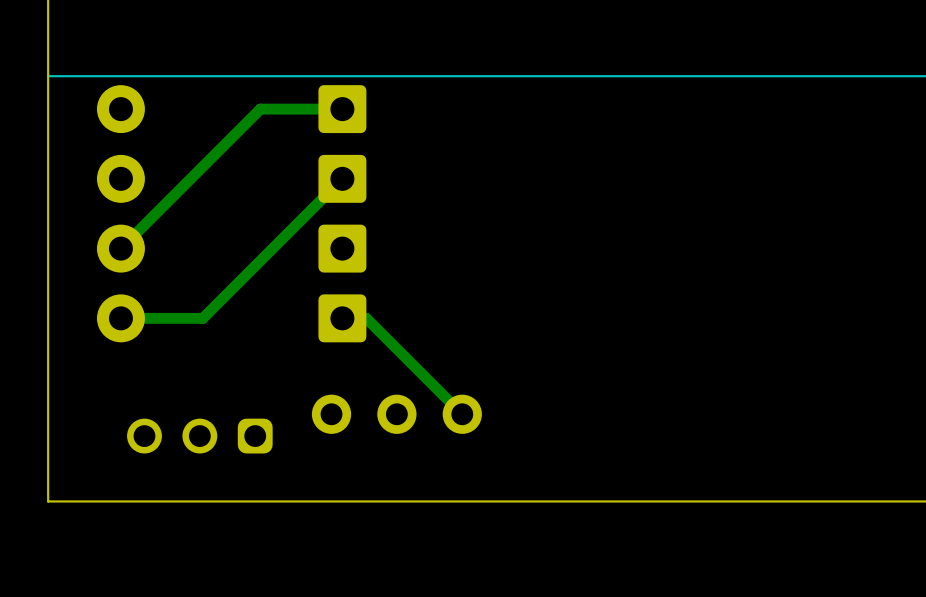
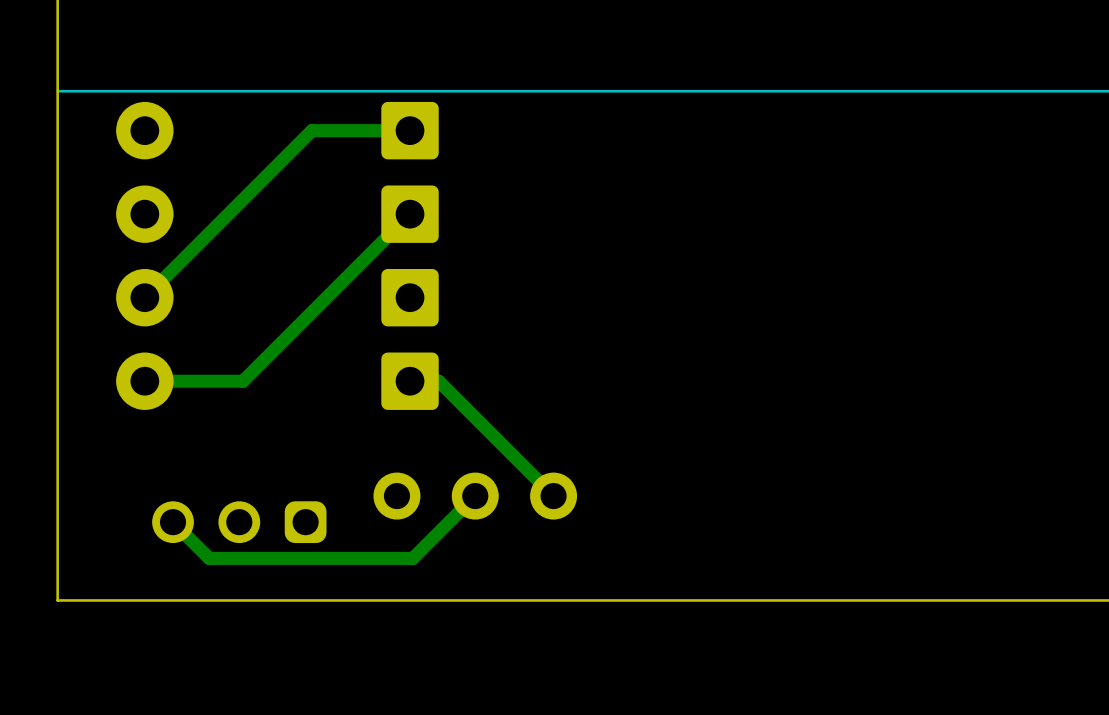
track: none -> (475, 496) (412, 558) (209, 558) (173, 522)

